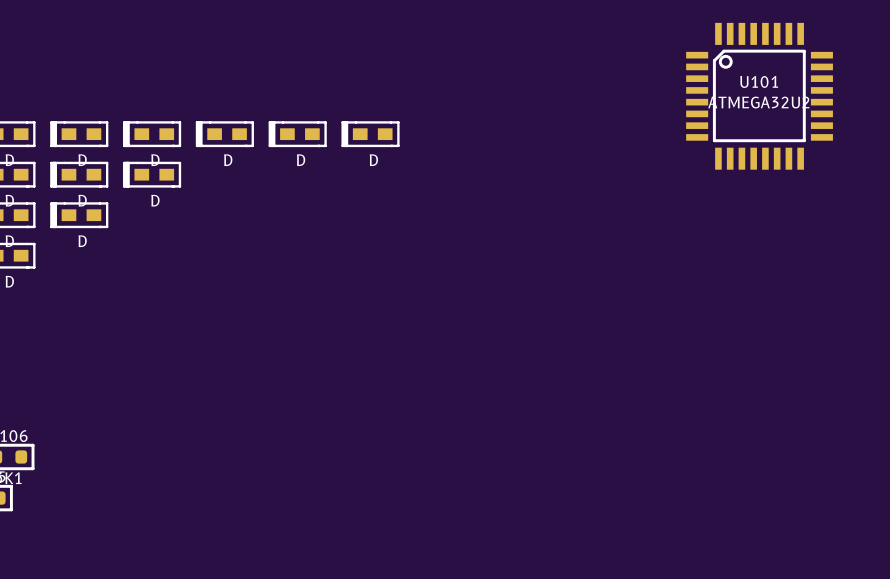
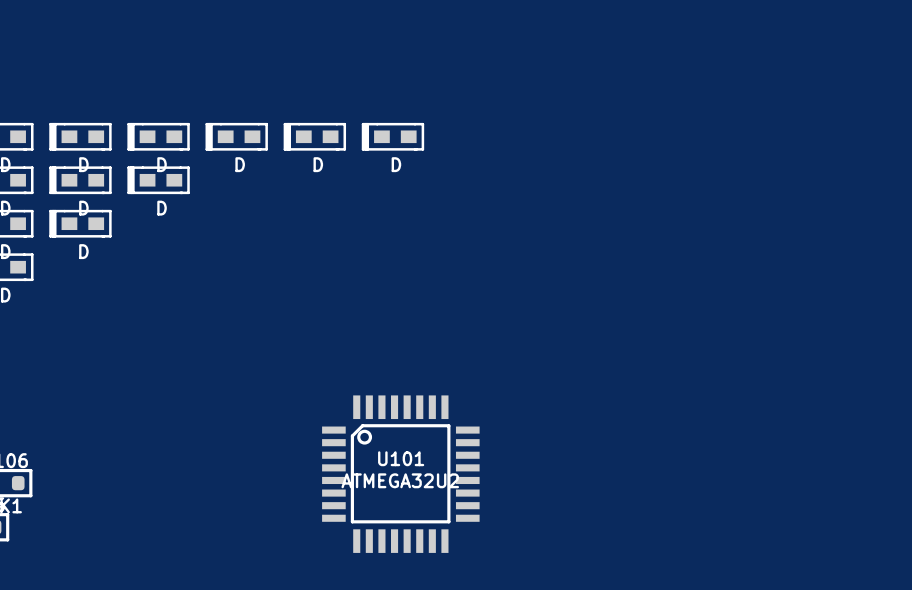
U101 position: (759, 96) -> (400, 474)

